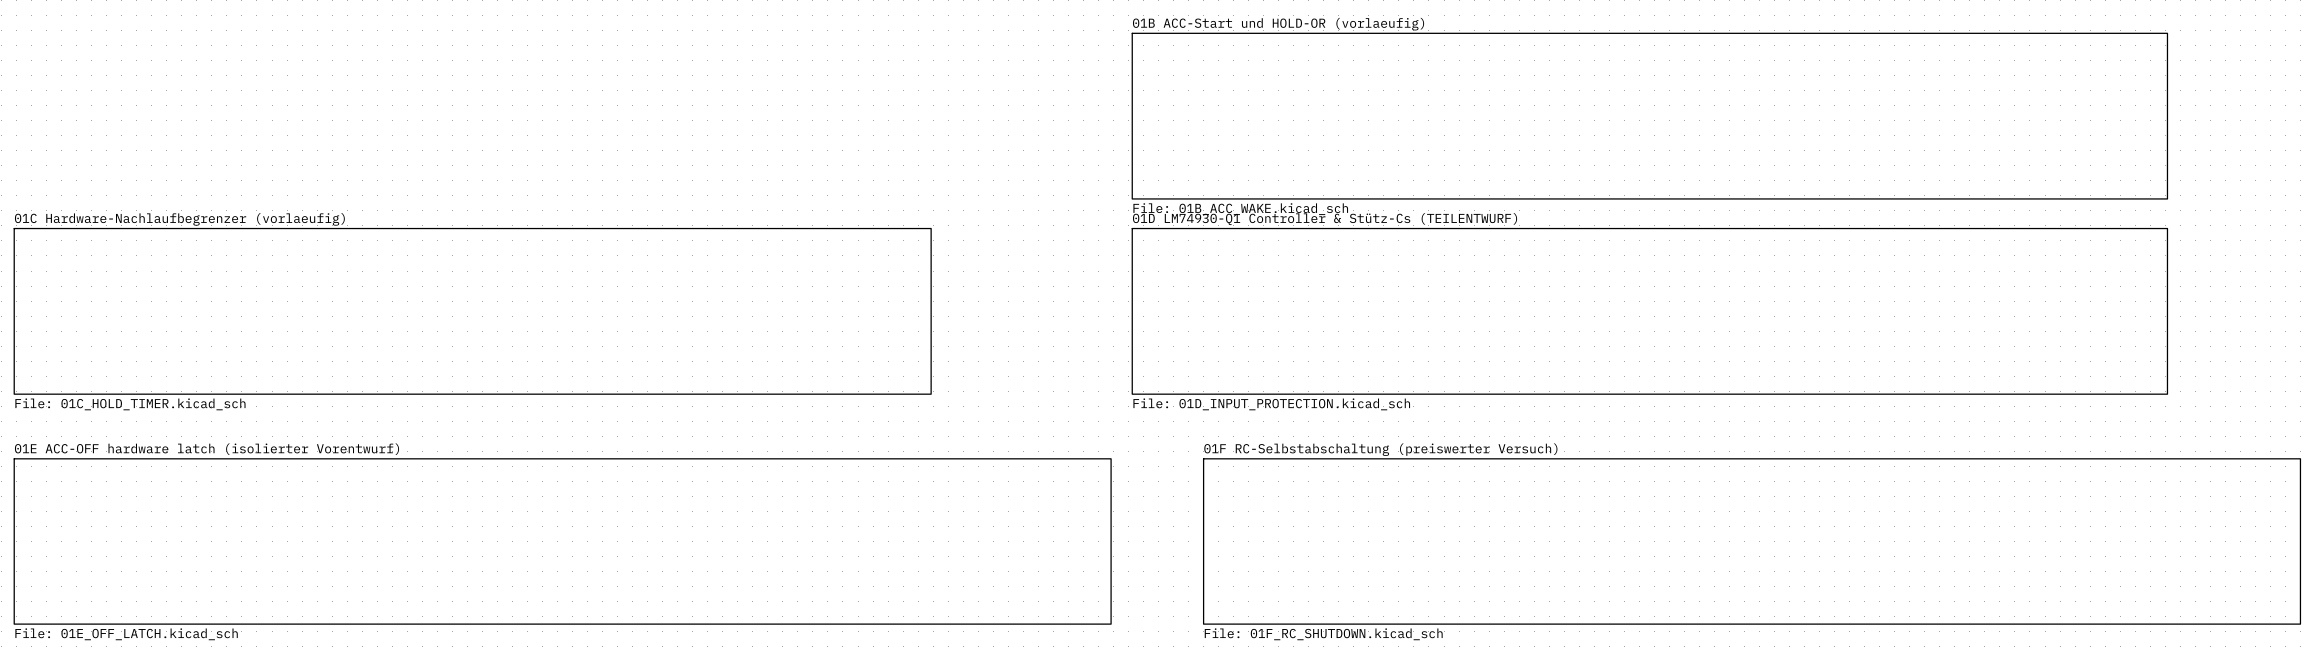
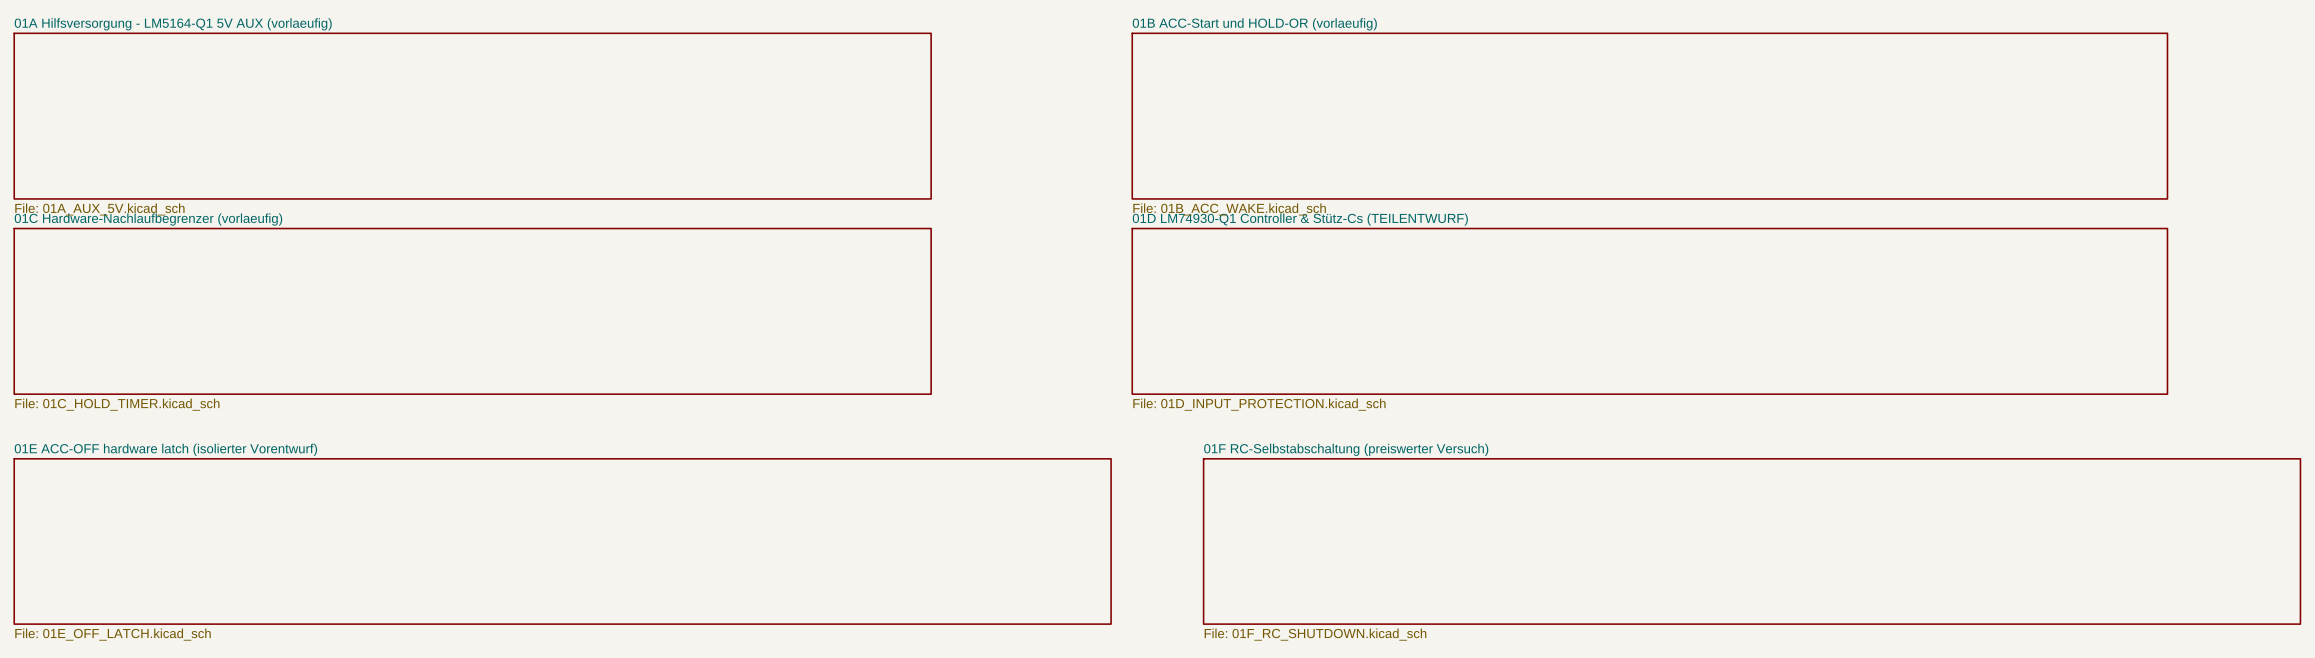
sheet 01A Hilfsversorgung - LM5164-Q1 5V AUX (vorlaeufig): none -> File: 01A_AUX_5V.kicad_sch (472, 116)

